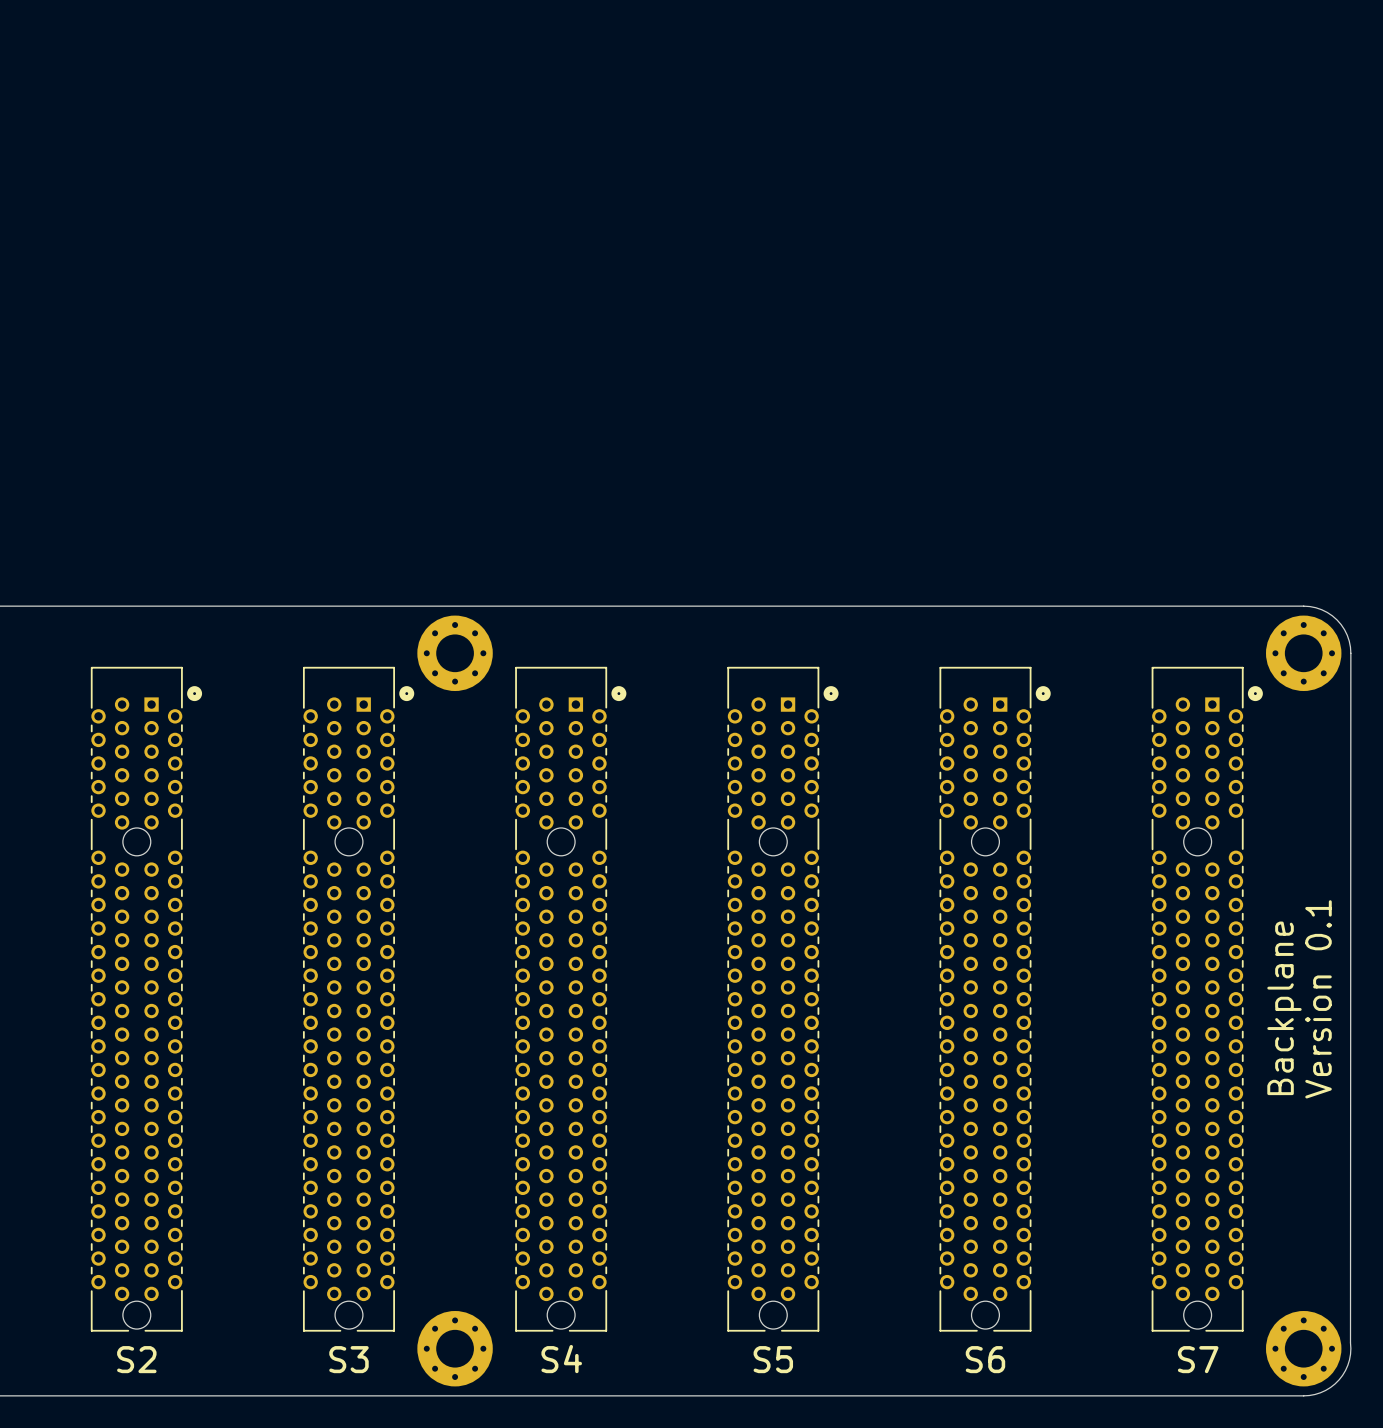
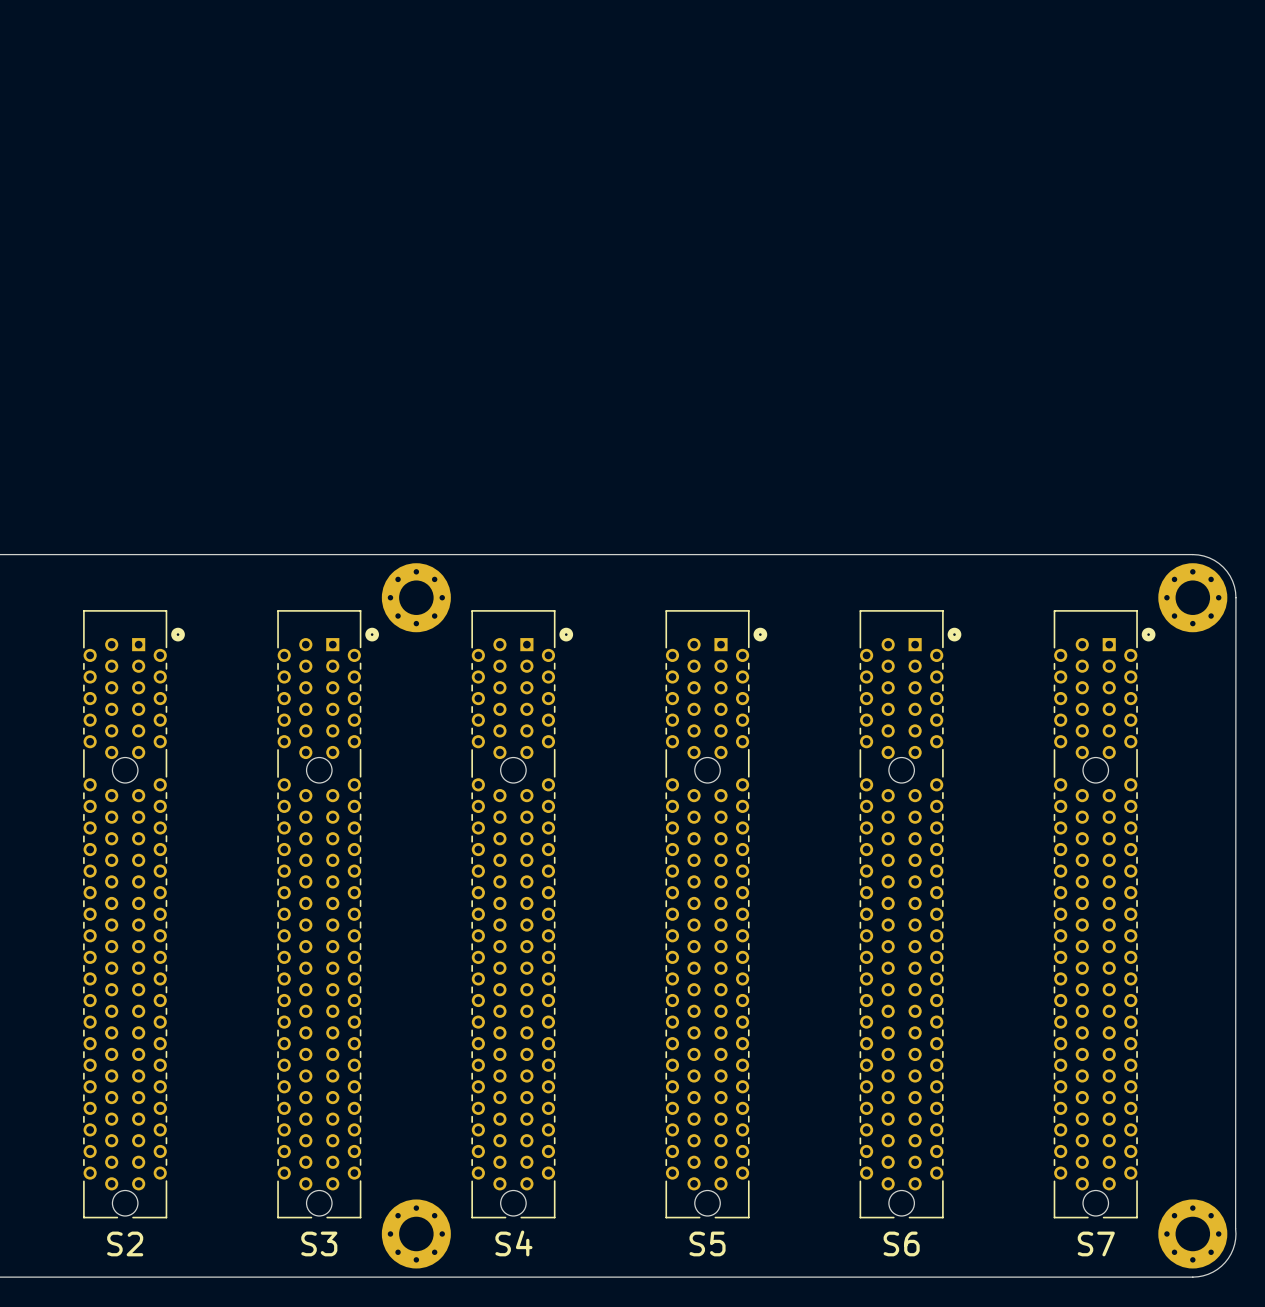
text: Version 0.1 (1318, 999) -> none
text: Backplane (1284, 1008) -> none

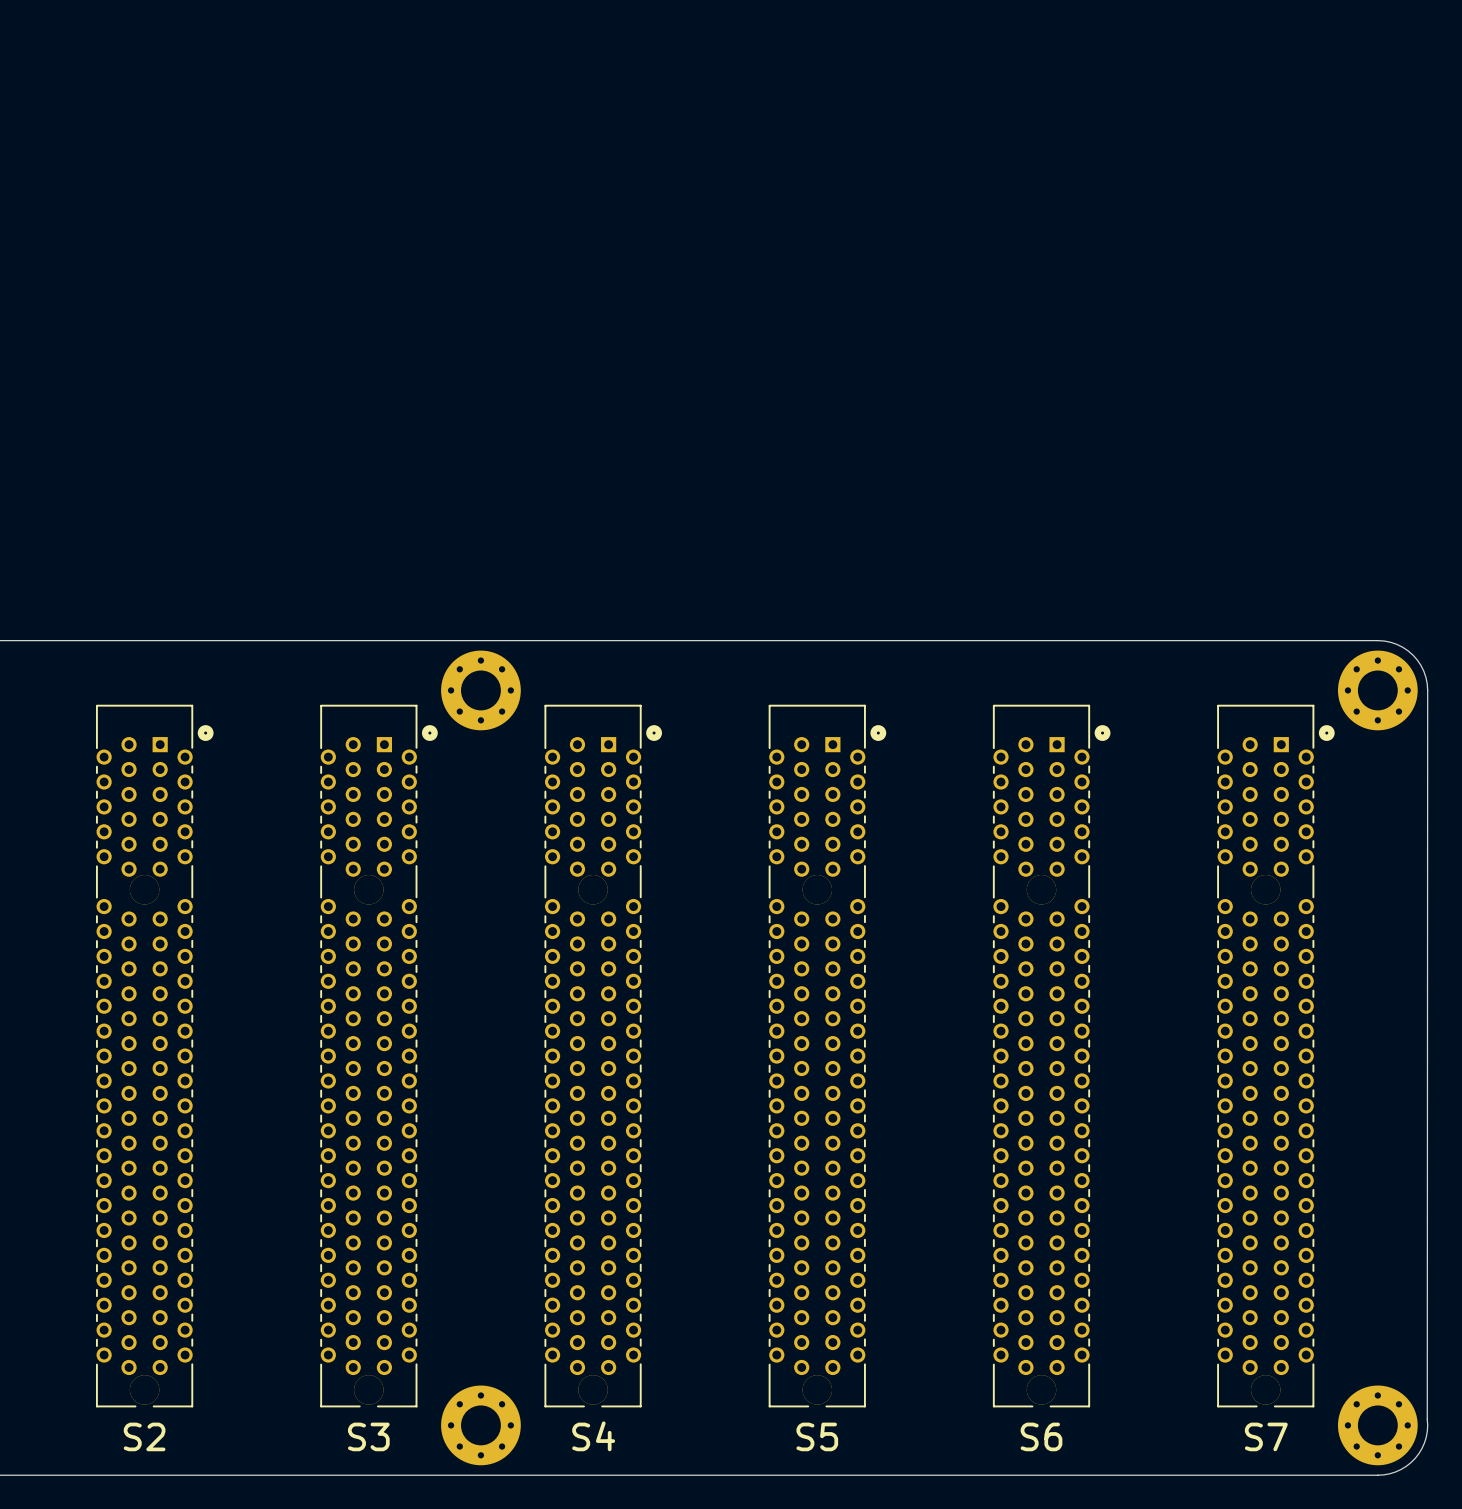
S2 footprint: [83, 610, 185, 1219] -> [95, 704, 214, 1408]
S3 footprint: [277, 610, 379, 1219] -> [320, 704, 438, 1408]
S4 footprint: [471, 610, 574, 1219] -> [544, 704, 663, 1408]
S5 footprint: [665, 610, 768, 1219] -> [768, 704, 887, 1408]
S6 footprint: [859, 610, 962, 1219] -> [992, 704, 1111, 1408]
S7 footprint: [1053, 610, 1156, 1219] -> [1217, 704, 1335, 1408]

